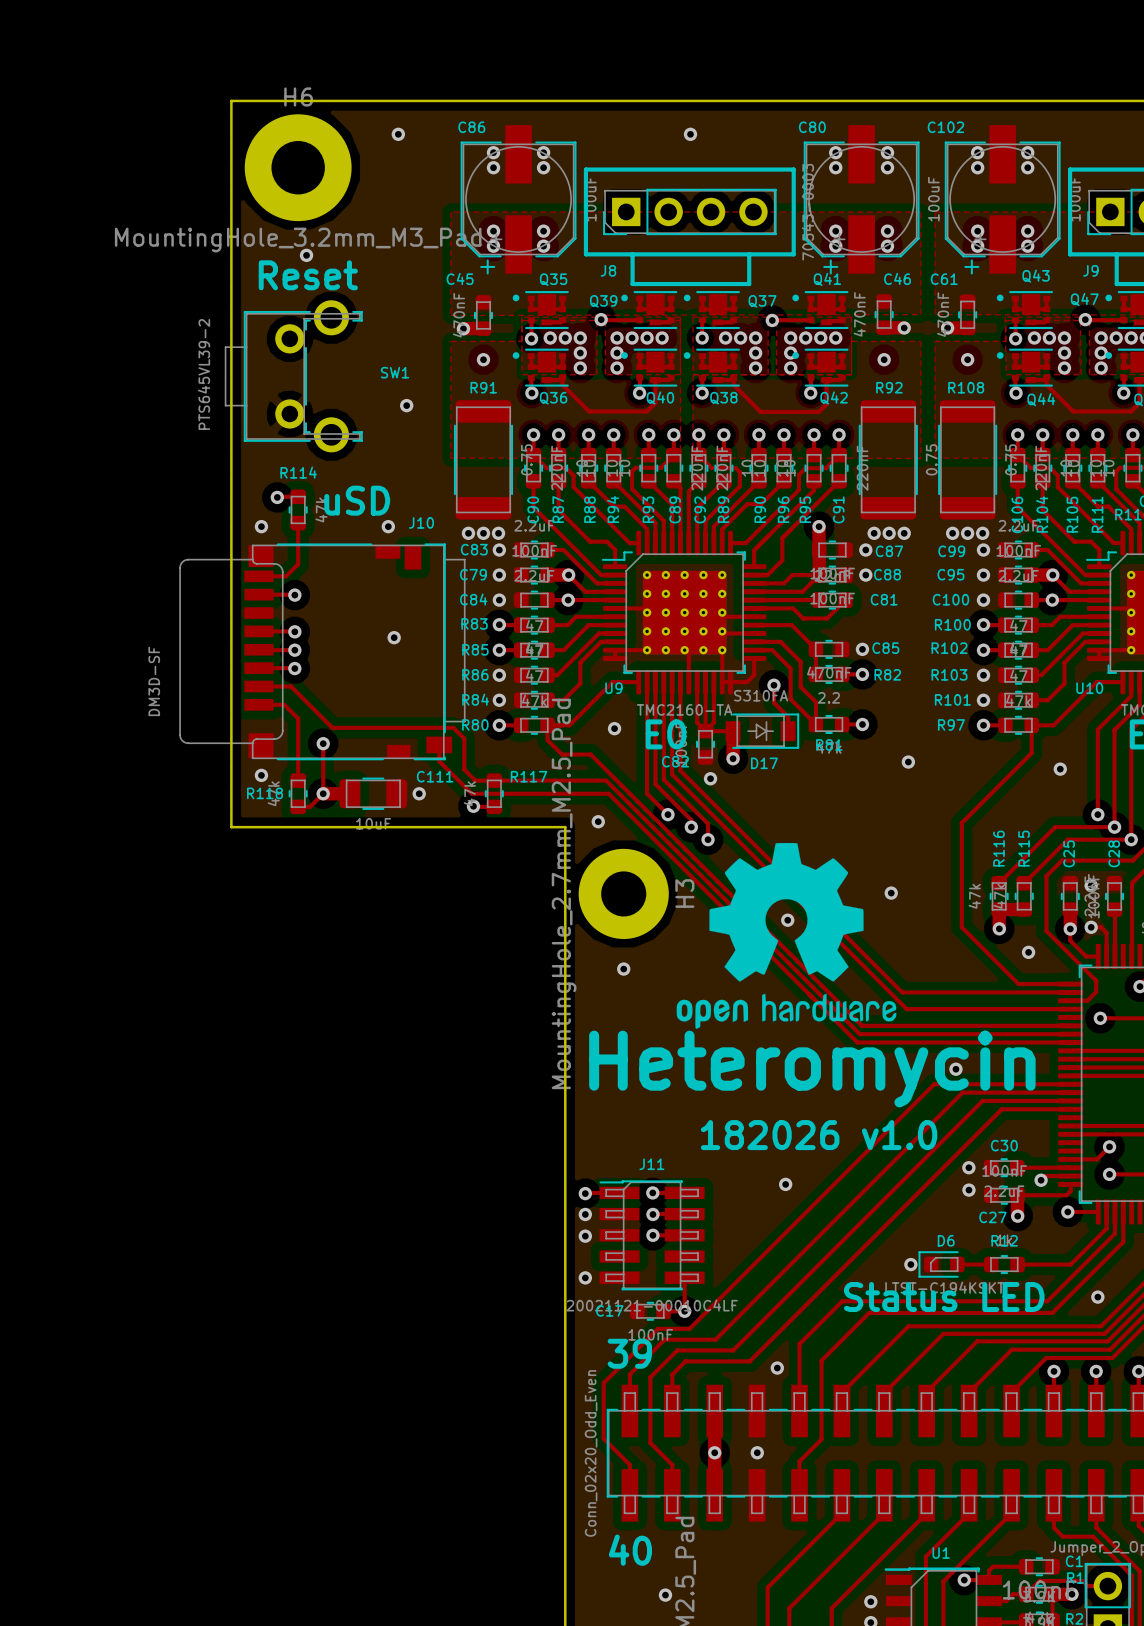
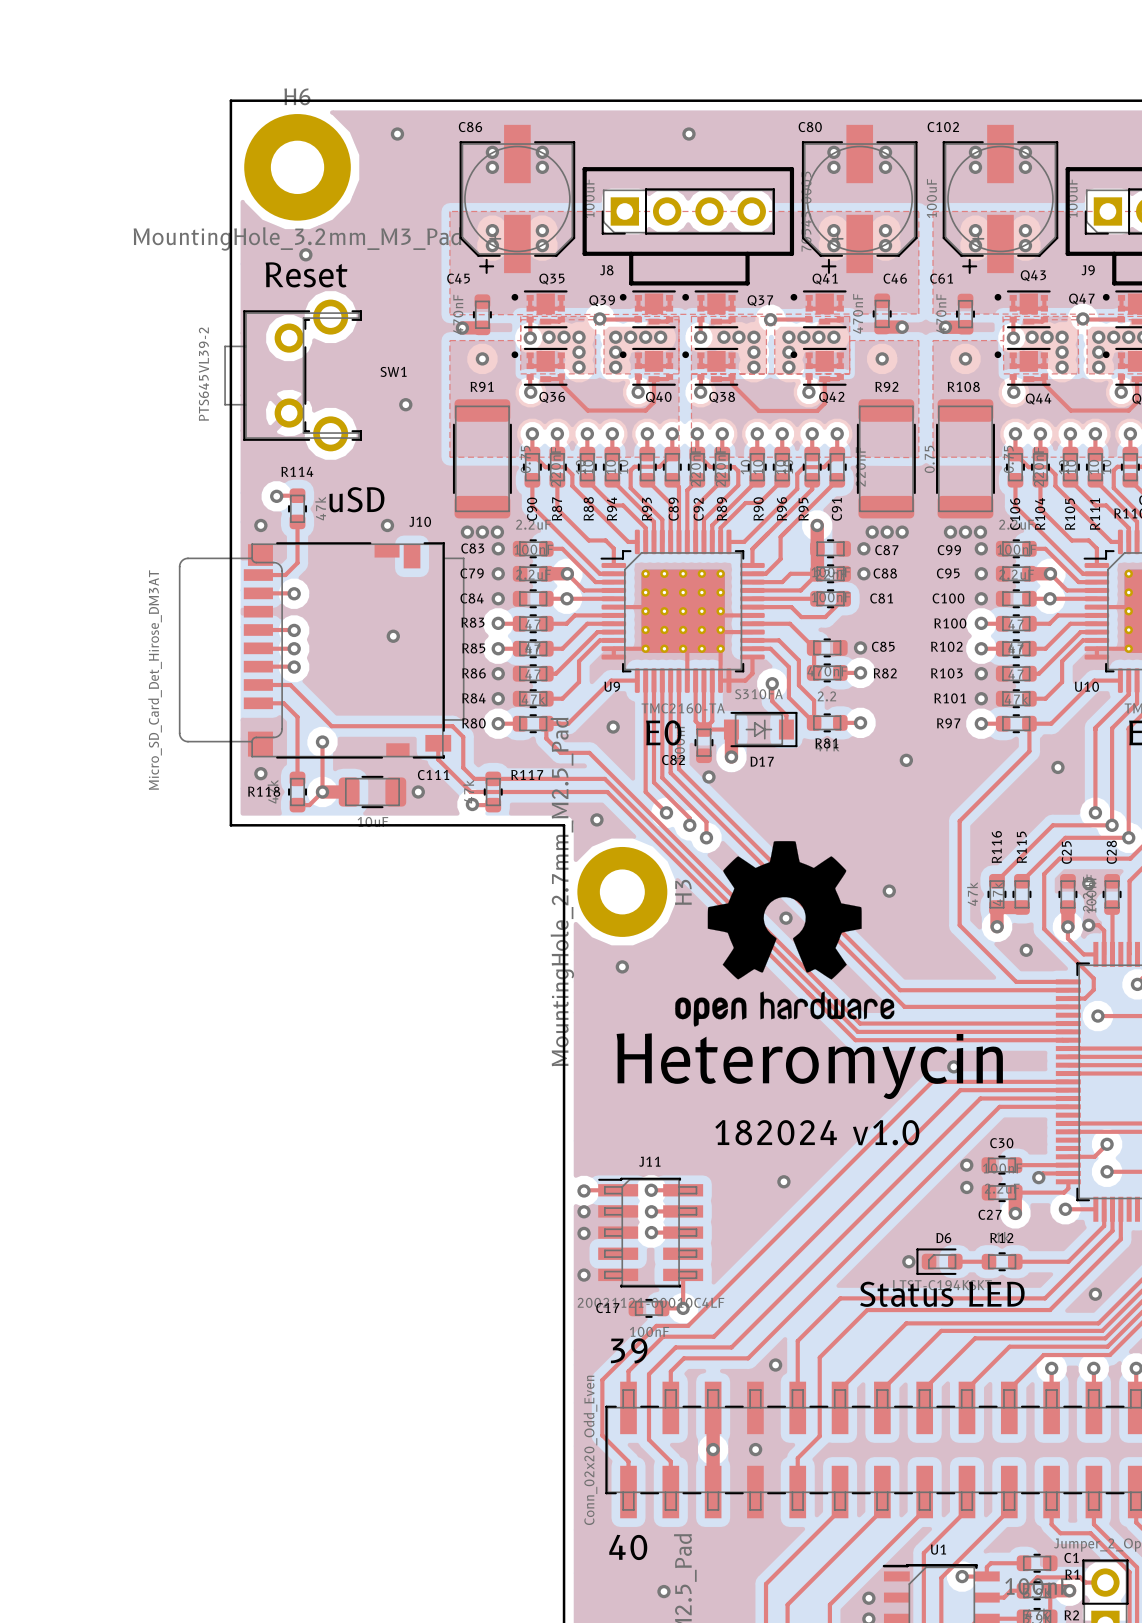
J10 value: DM3D-SF (154, 681) -> Micro_SD_Card_Det_Hirose_DM3AT (155, 680)
text: 182026 v1.0 (819, 1135) -> 182024 v1.0 (817, 1132)

